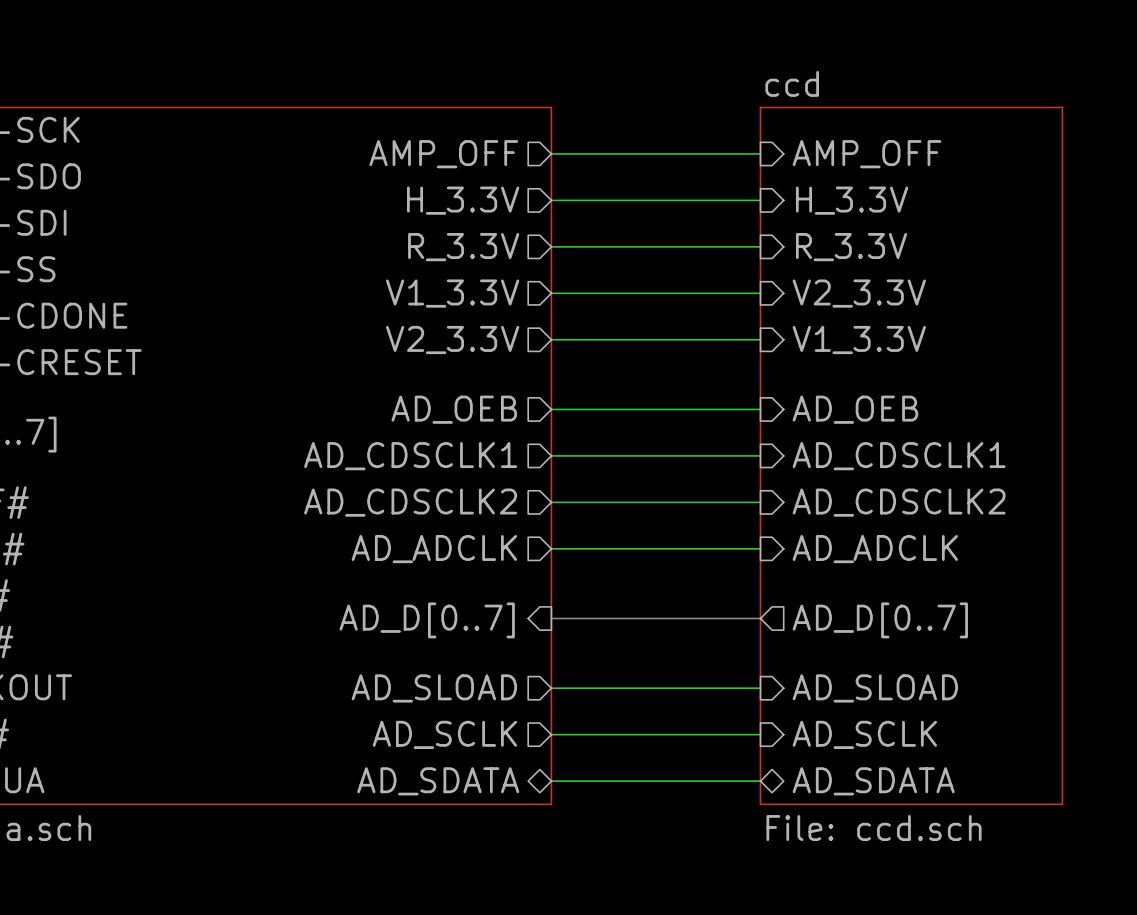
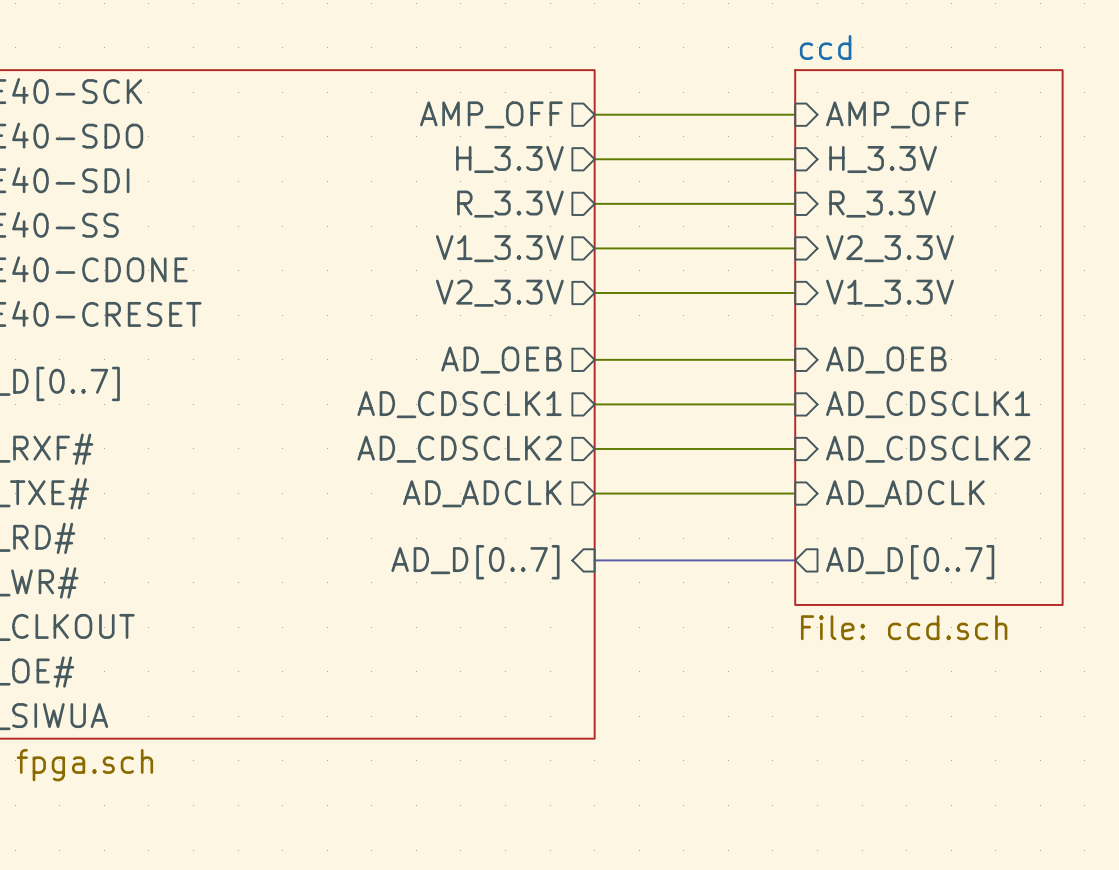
sheet ccd: none -> File: ccd.sch (928, 337)
sheet ccd: File: ccd.sch (911, 455) -> none
sheet pin: AD_SLOAD (434, 688) -> none
wire: (551, 688) (760, 688) -> none
sheet pin: AD_SLOAD (875, 688) -> none
sheet pin: AD_SCLK (444, 734) -> none
wire: (551, 734) (760, 734) -> none
sheet pin: AD_SCLK (864, 734) -> none
sheet pin: AD_SDATA (438, 781) -> none
wire: (551, 781) (760, 781) -> none
sheet pin: AD_SDATA (873, 781) -> none

